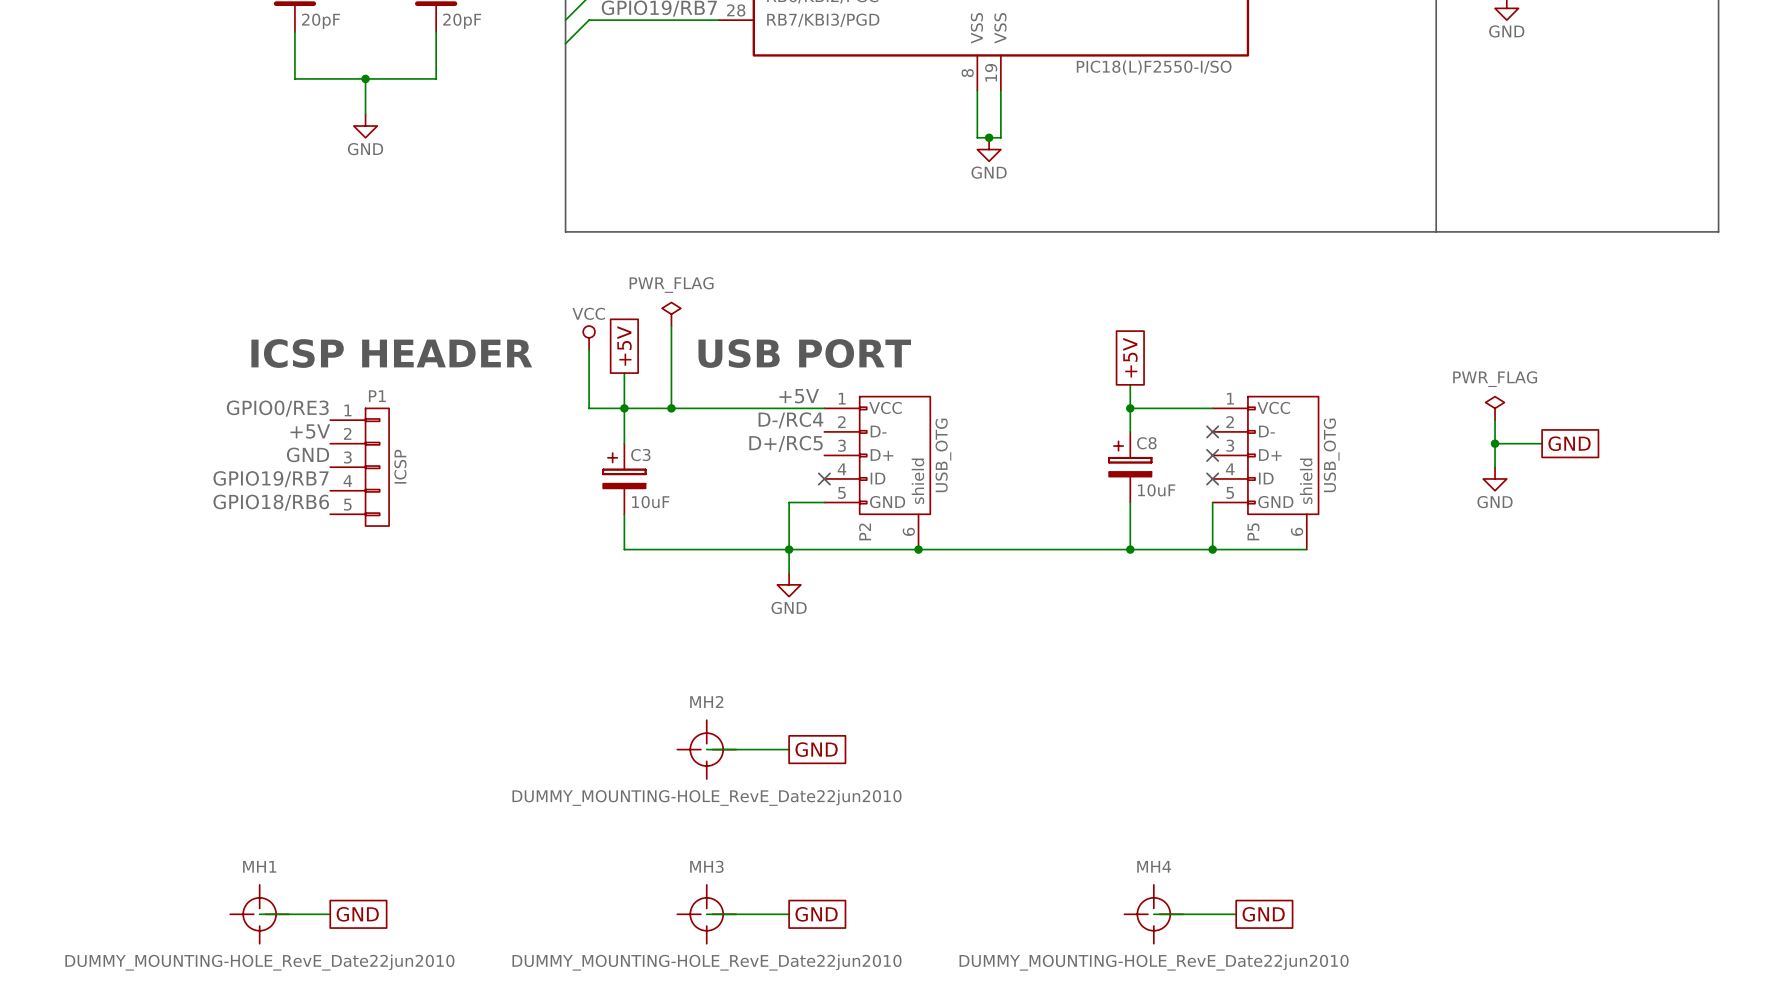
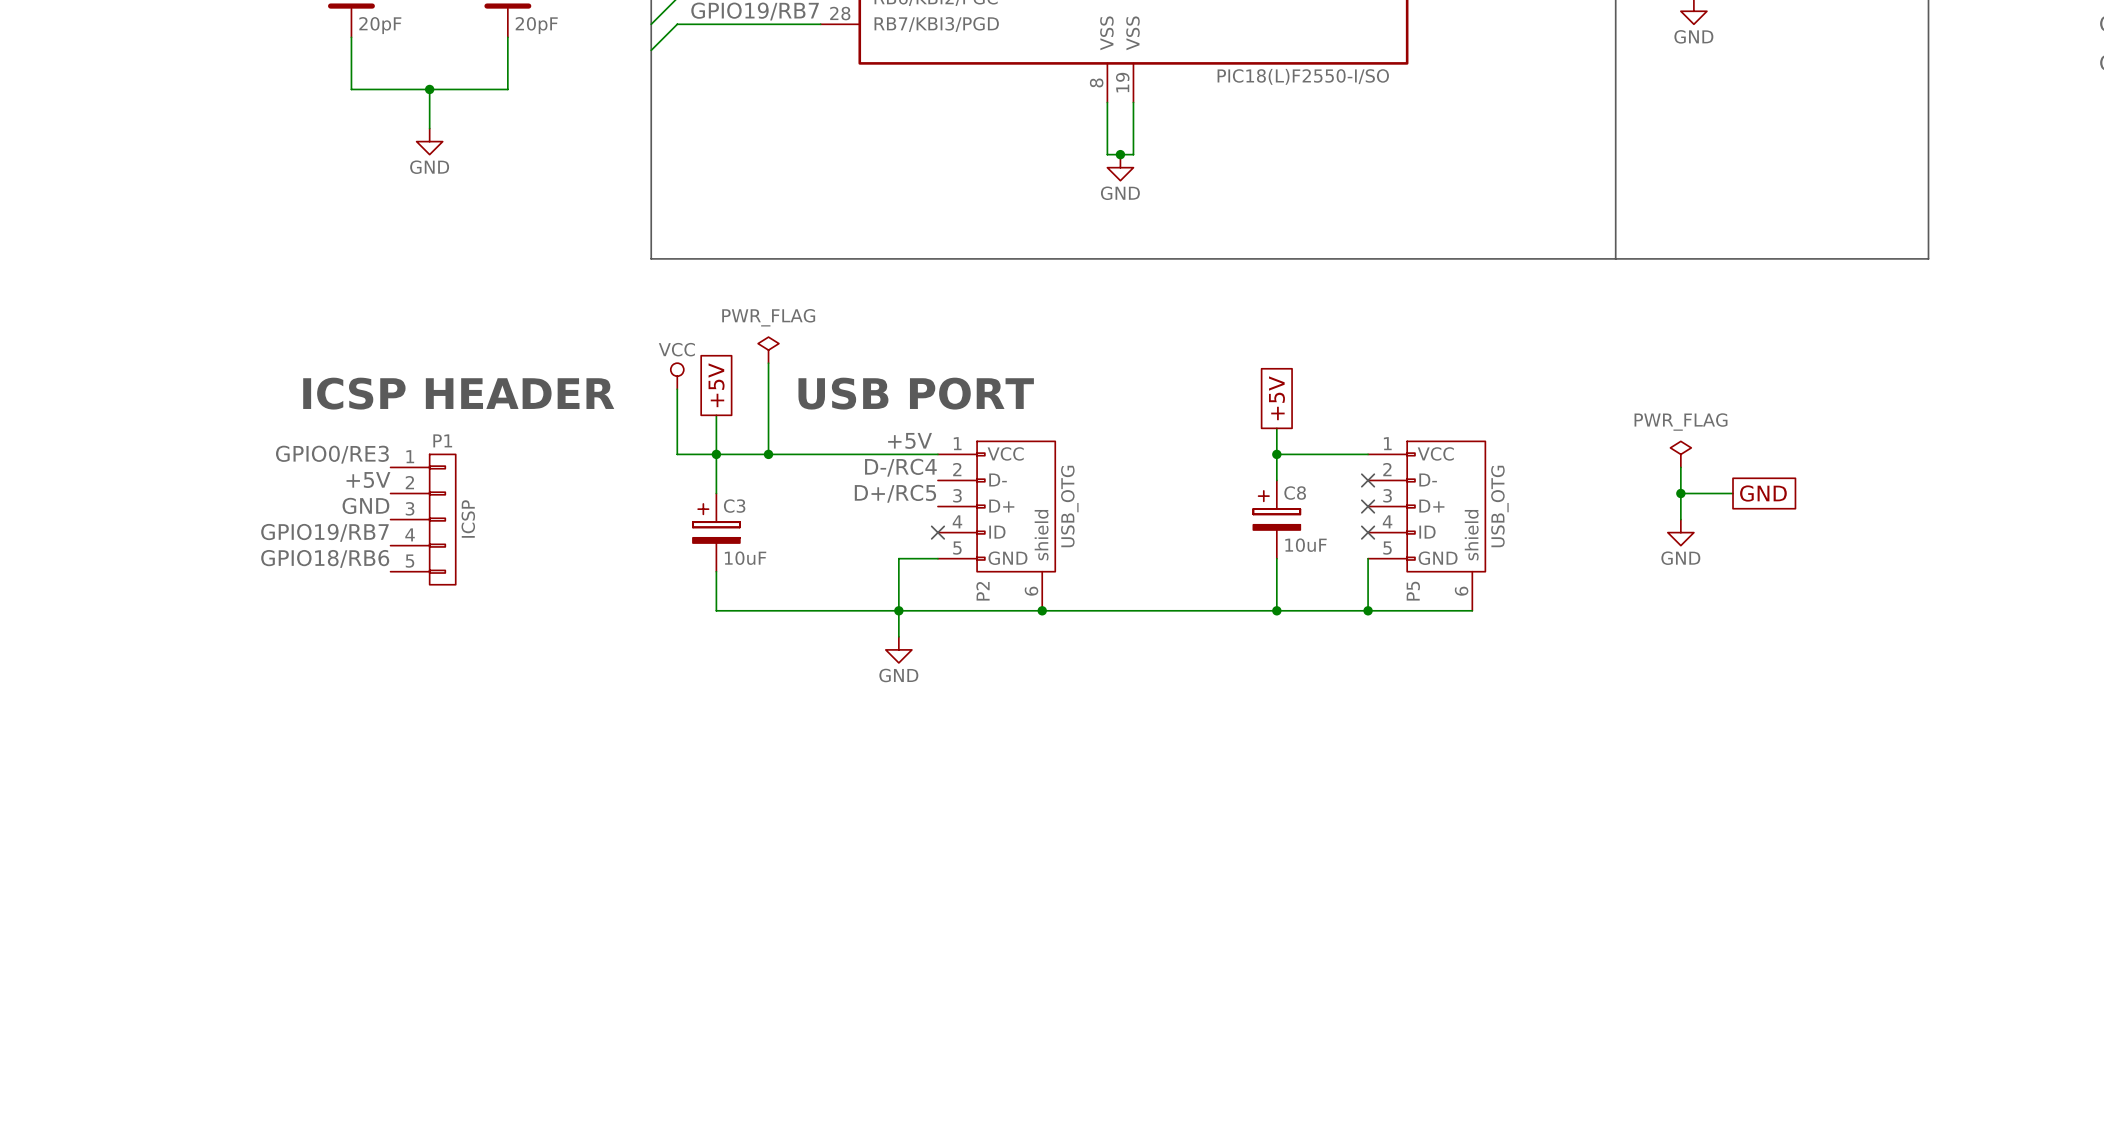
wire: (706, 749) (789, 749) -> none
MH2: DUMMY_MOUNTING-HOLE_RevE_Date22jun2010 (706, 749) -> none
global label: GND (816, 749) -> none
wire: (259, 914) (330, 914) -> none
MH1: DUMMY_MOUNTING-HOLE_RevE_Date22jun2010 (259, 914) -> none
global label: GND (357, 914) -> none
wire: (706, 914) (789, 914) -> none
MH3: DUMMY_MOUNTING-HOLE_RevE_Date22jun2010 (706, 914) -> none
global label: GND (816, 914) -> none
wire: (1153, 914) (1236, 914) -> none
MH4: DUMMY_MOUNTING-HOLE_RevE_Date22jun2010 (1153, 914) -> none
global label: GND (1263, 914) -> none

